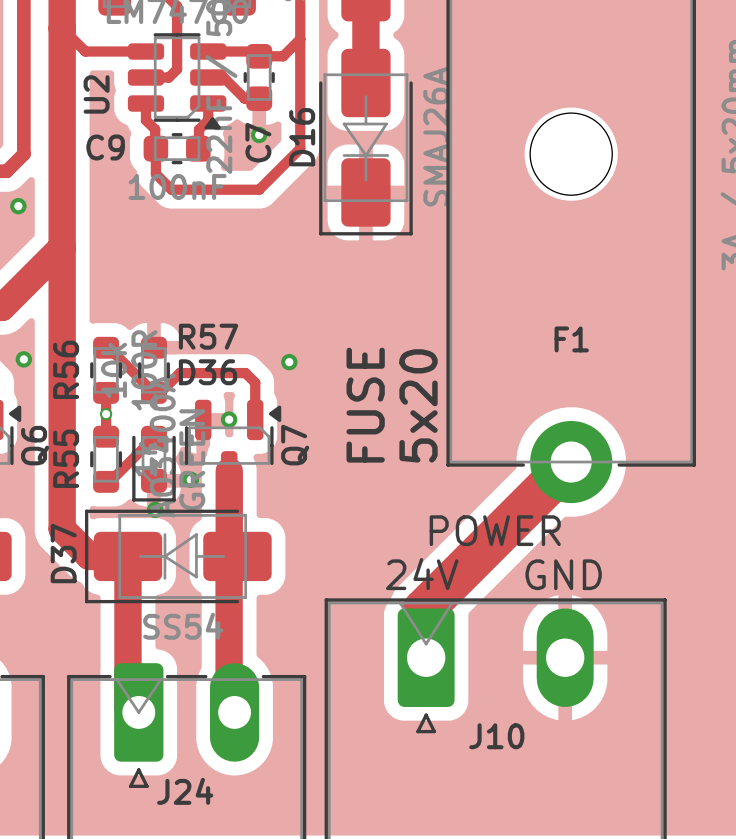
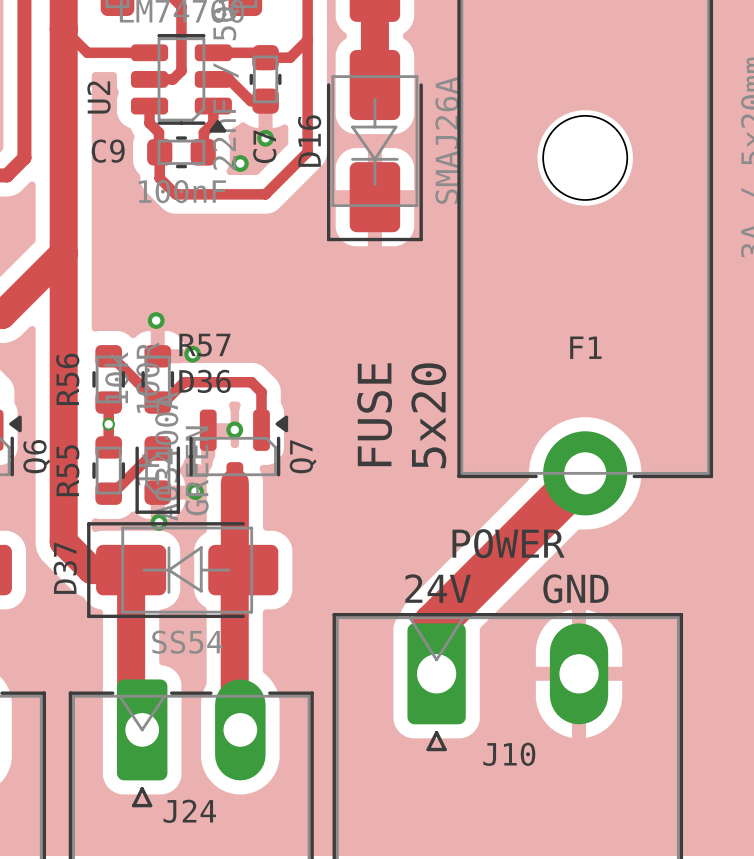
via: none -> (240, 163)
via: (18, 206) -> none
via: none -> (156, 320)
via: none -> (192, 354)
via: (23, 359) -> none
via: (289, 362) -> none

